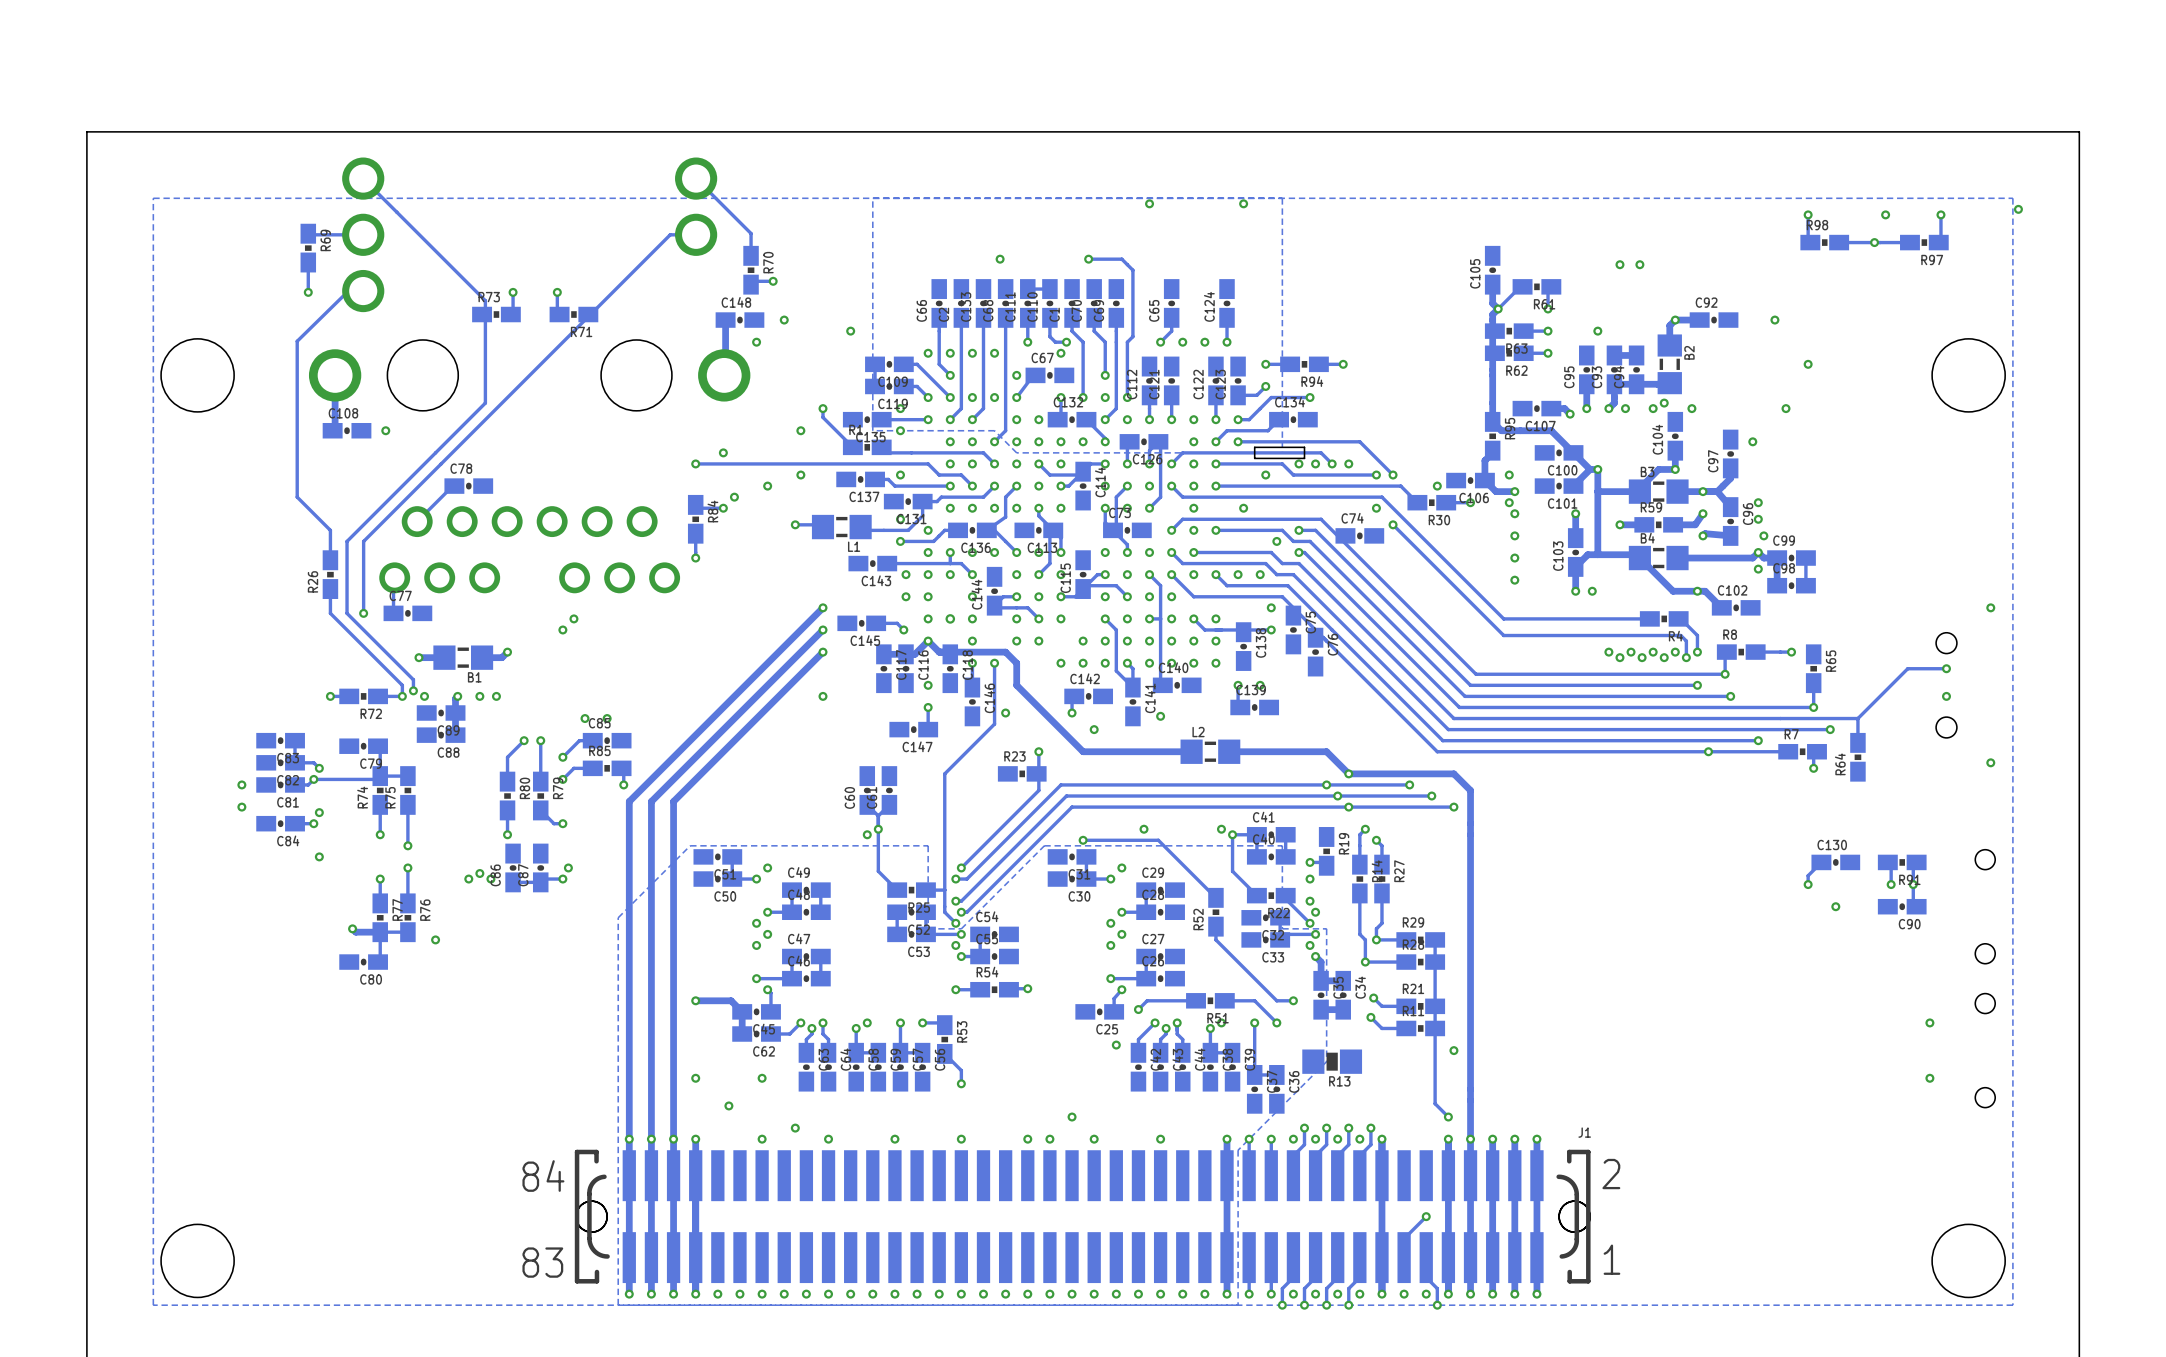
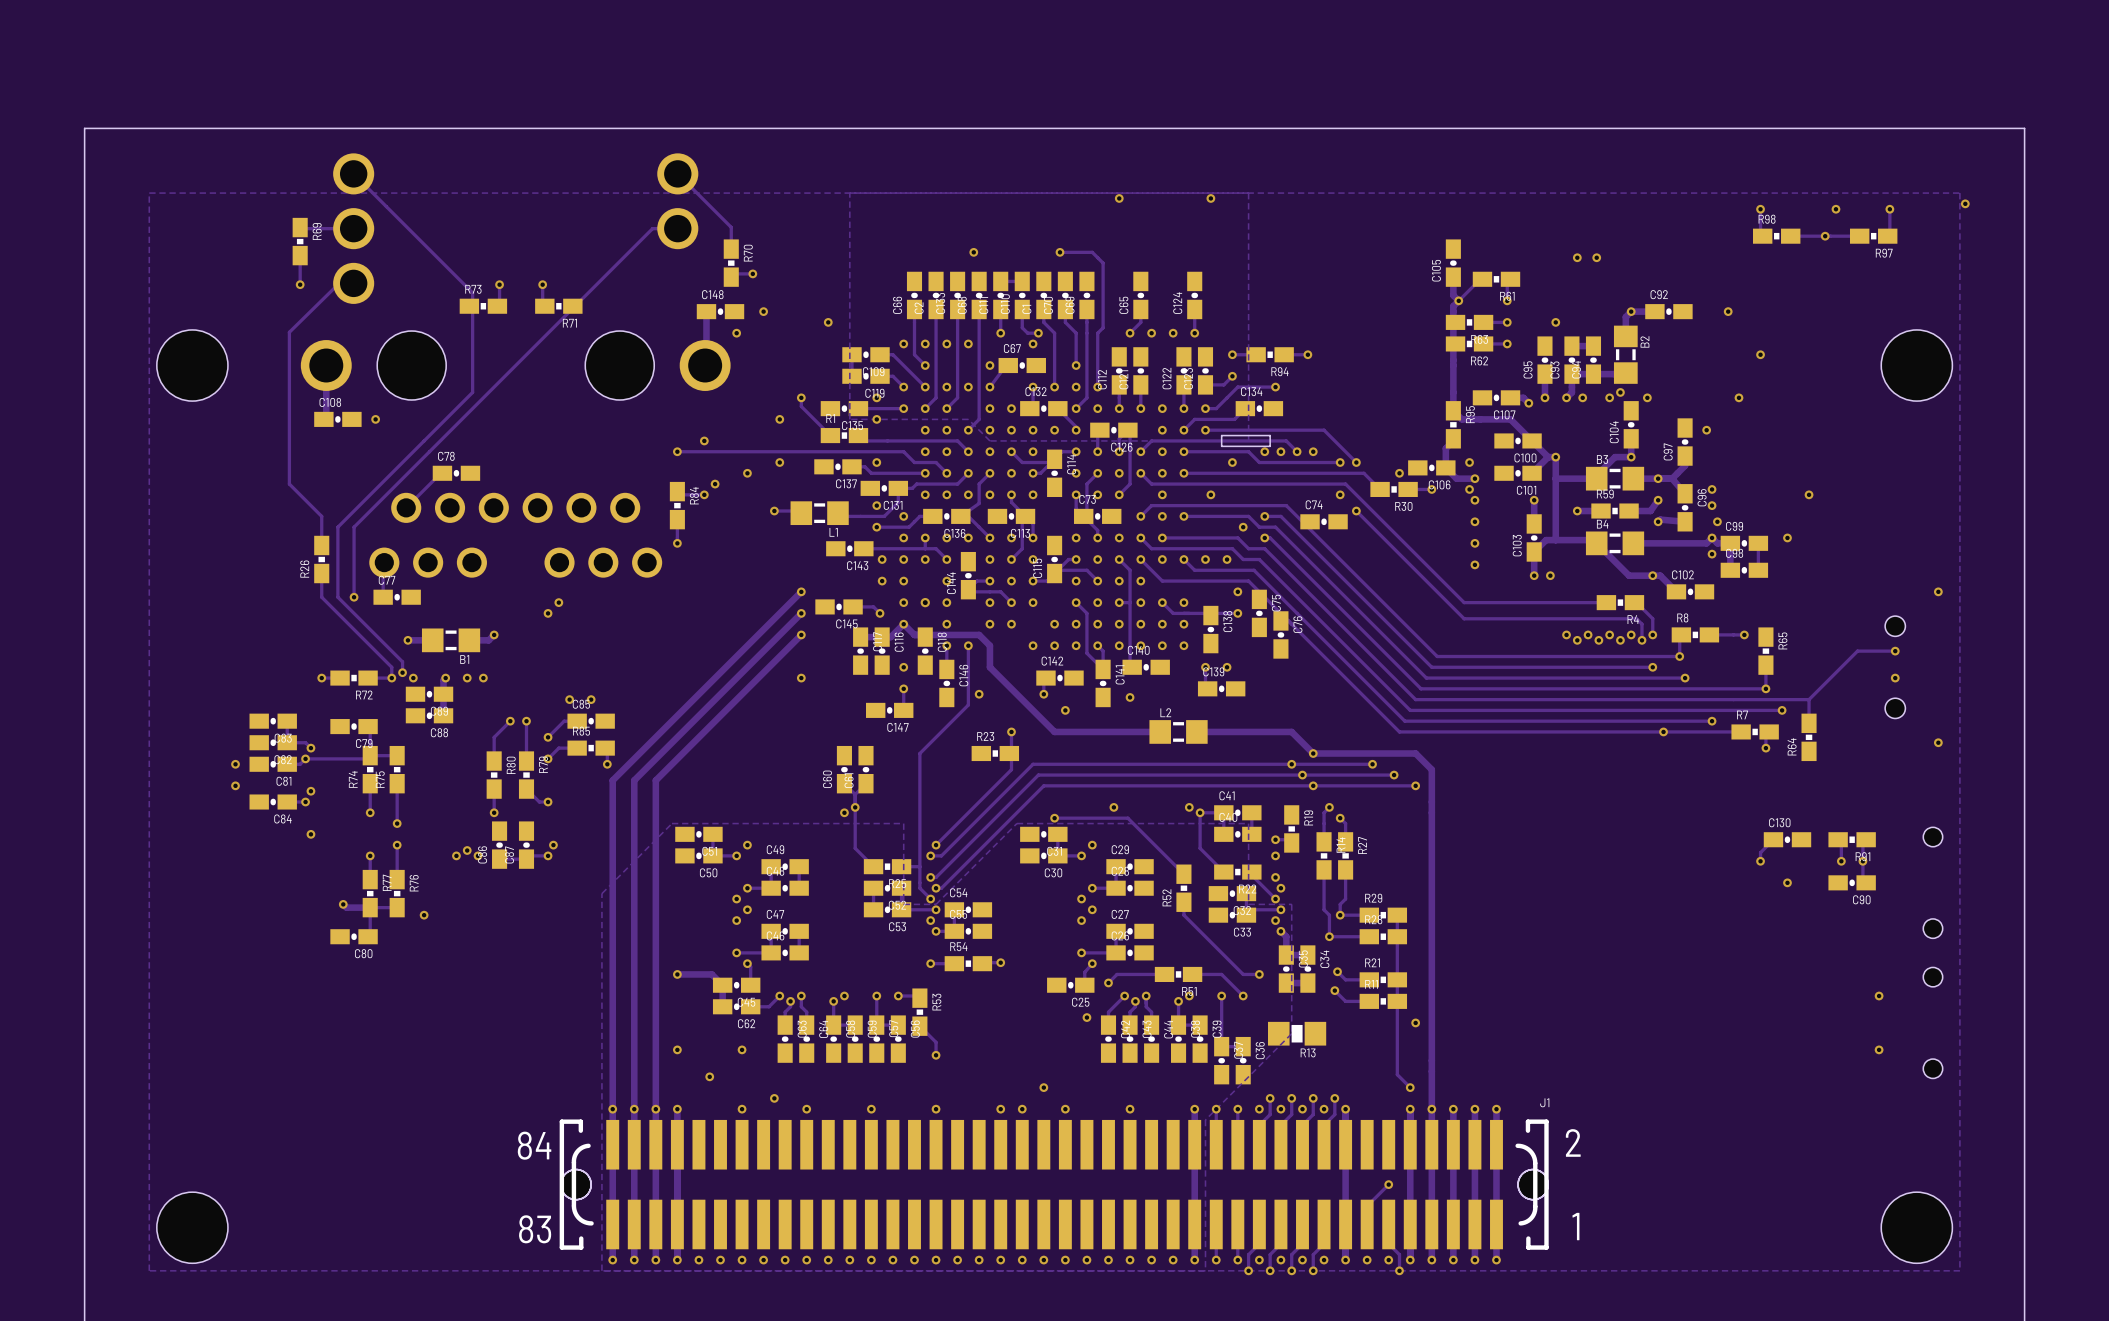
via: none -> (1809, 494)
via: none -> (1787, 537)

